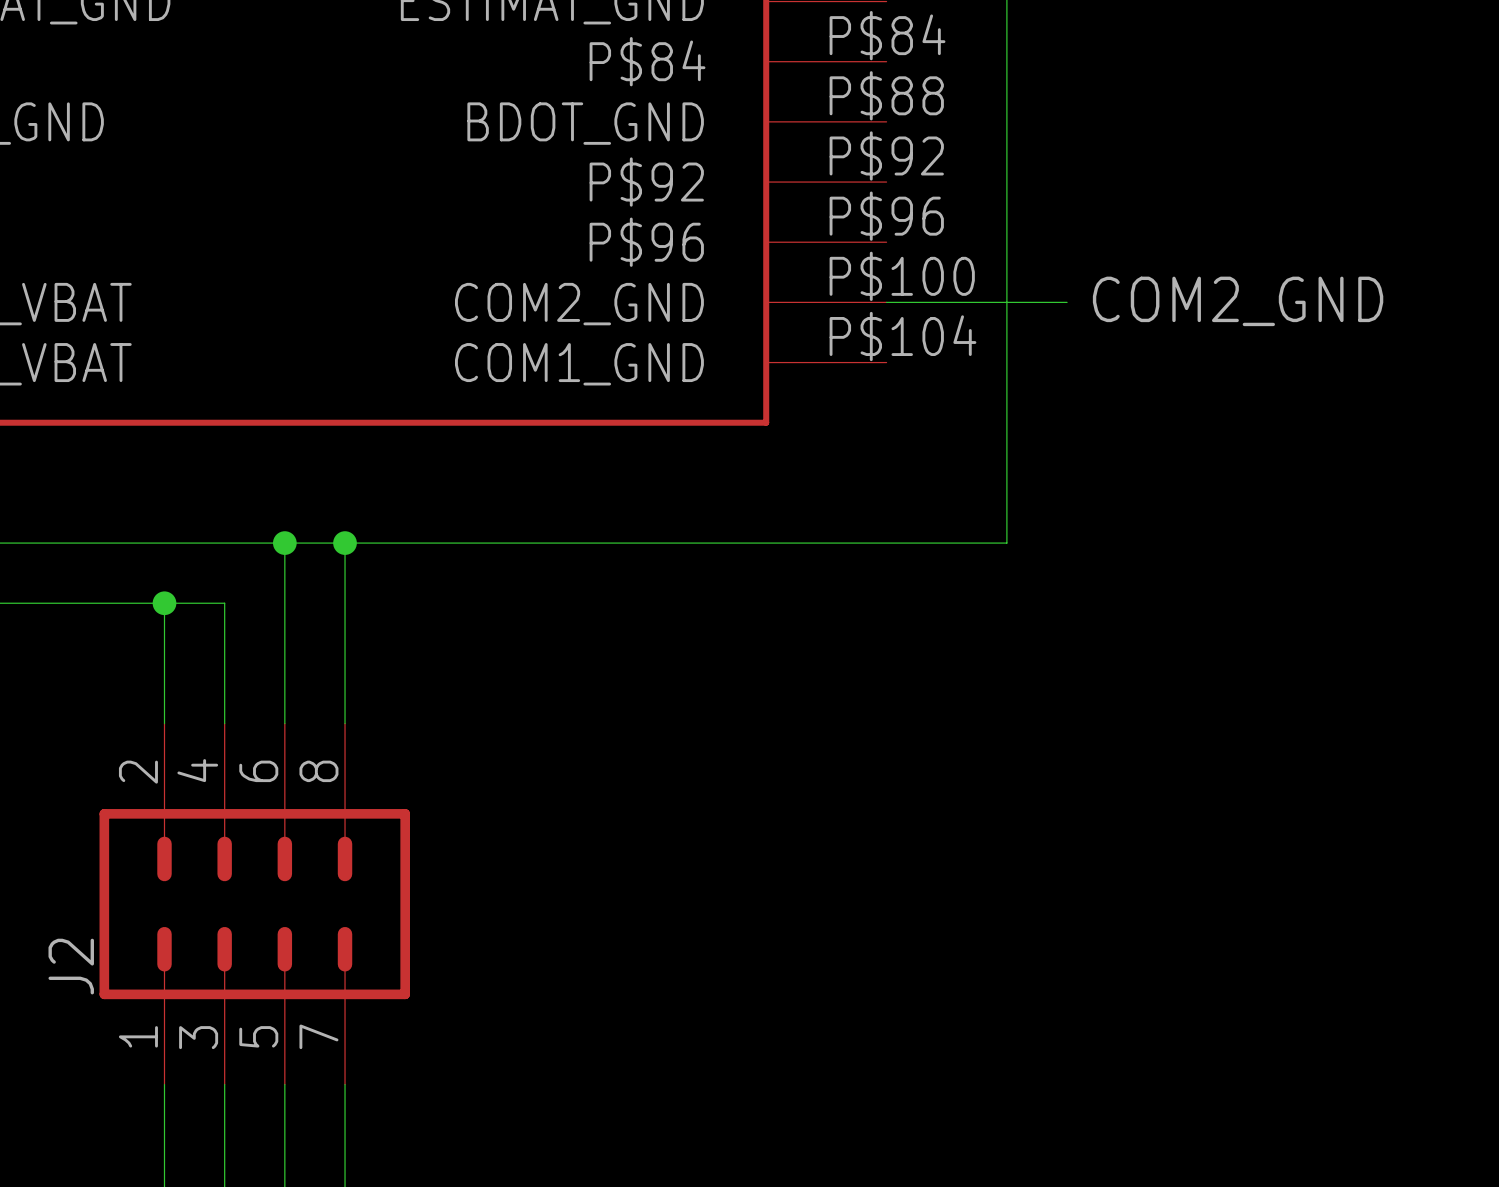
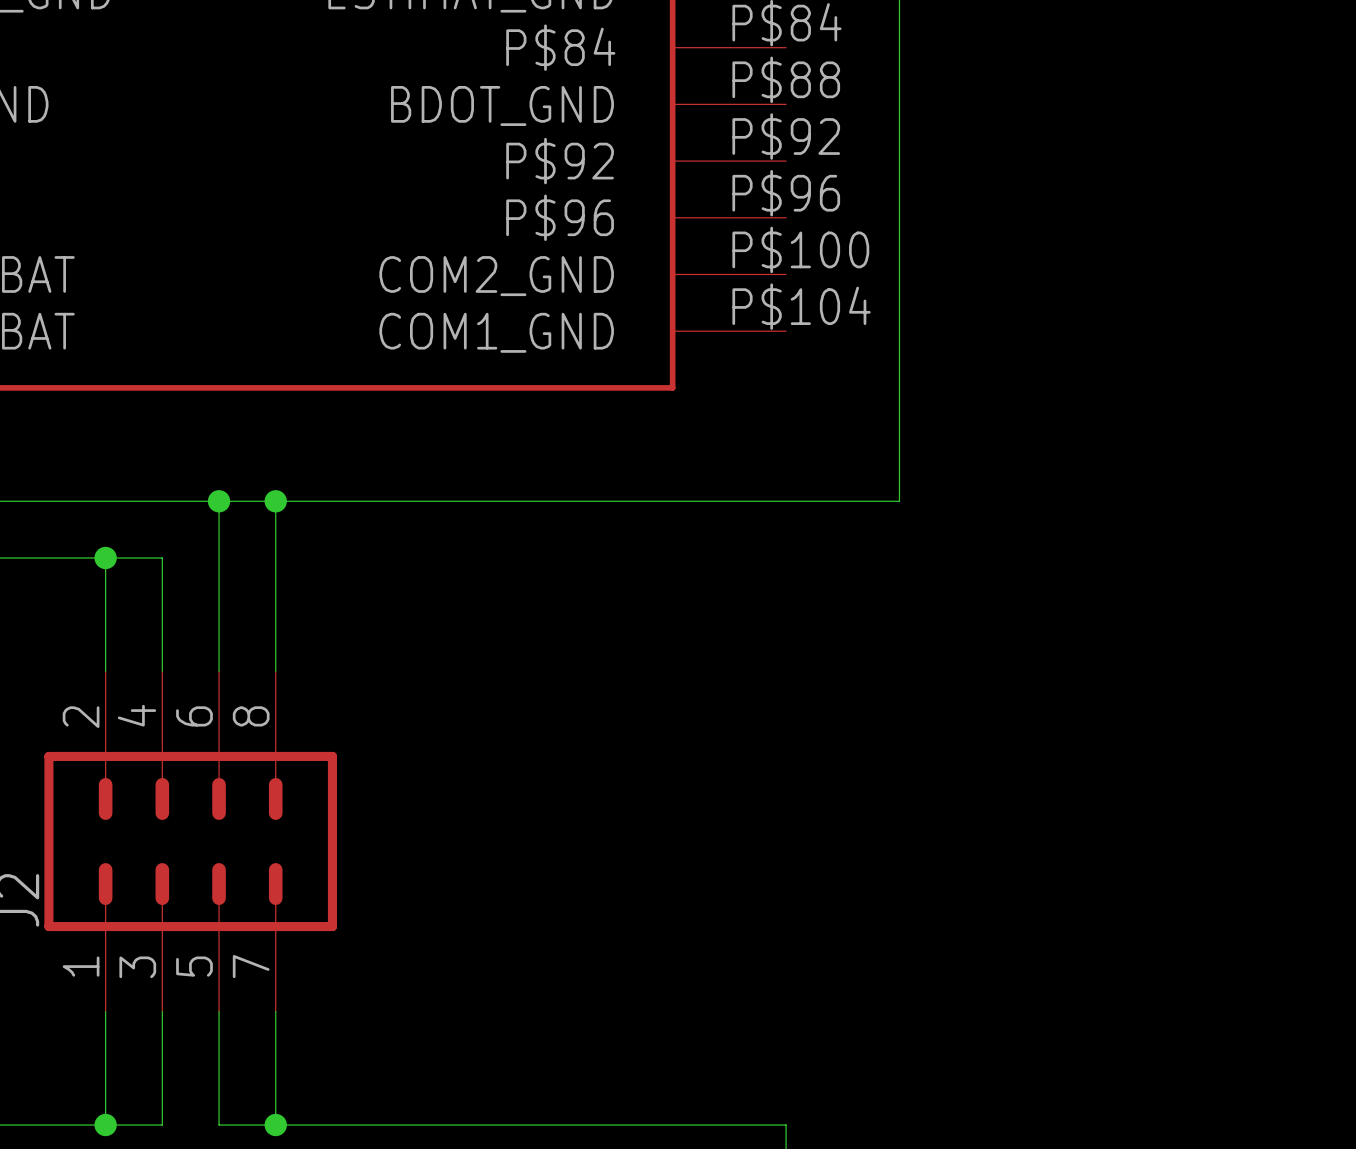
label: COM2_GND (1238, 301) -> none
wire: (886, 302) (1067, 302) -> none

